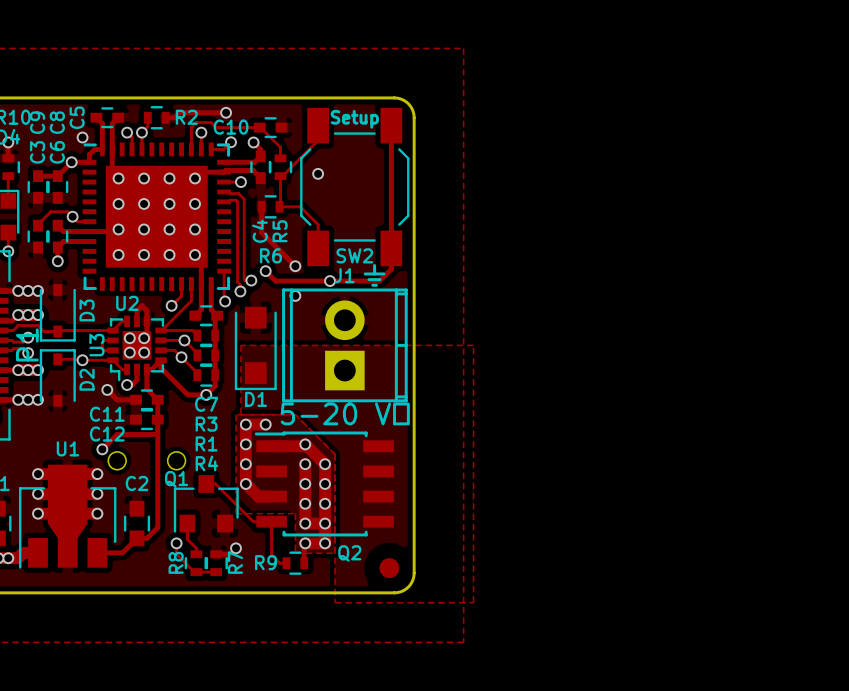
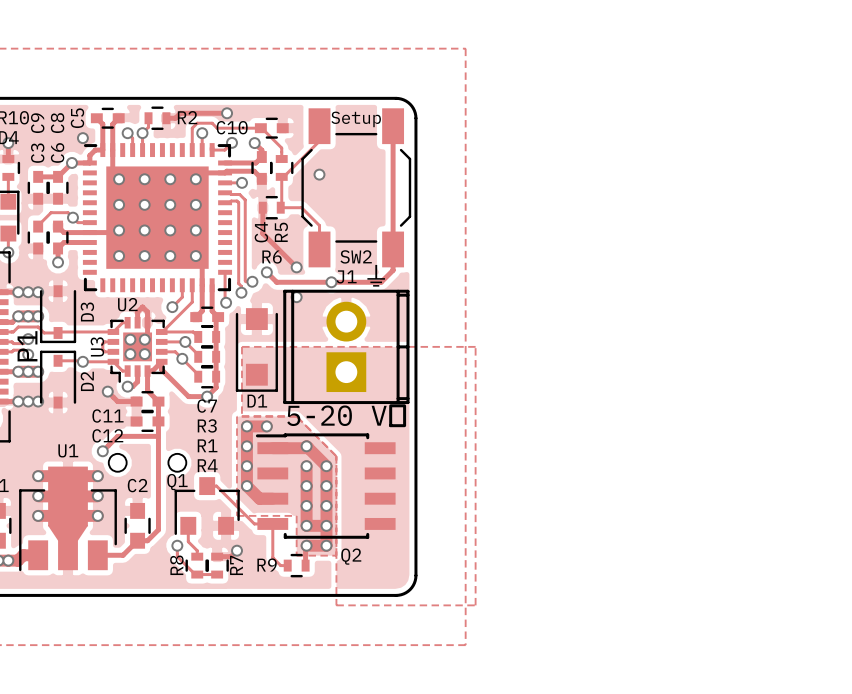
part: (389, 568) -> none

